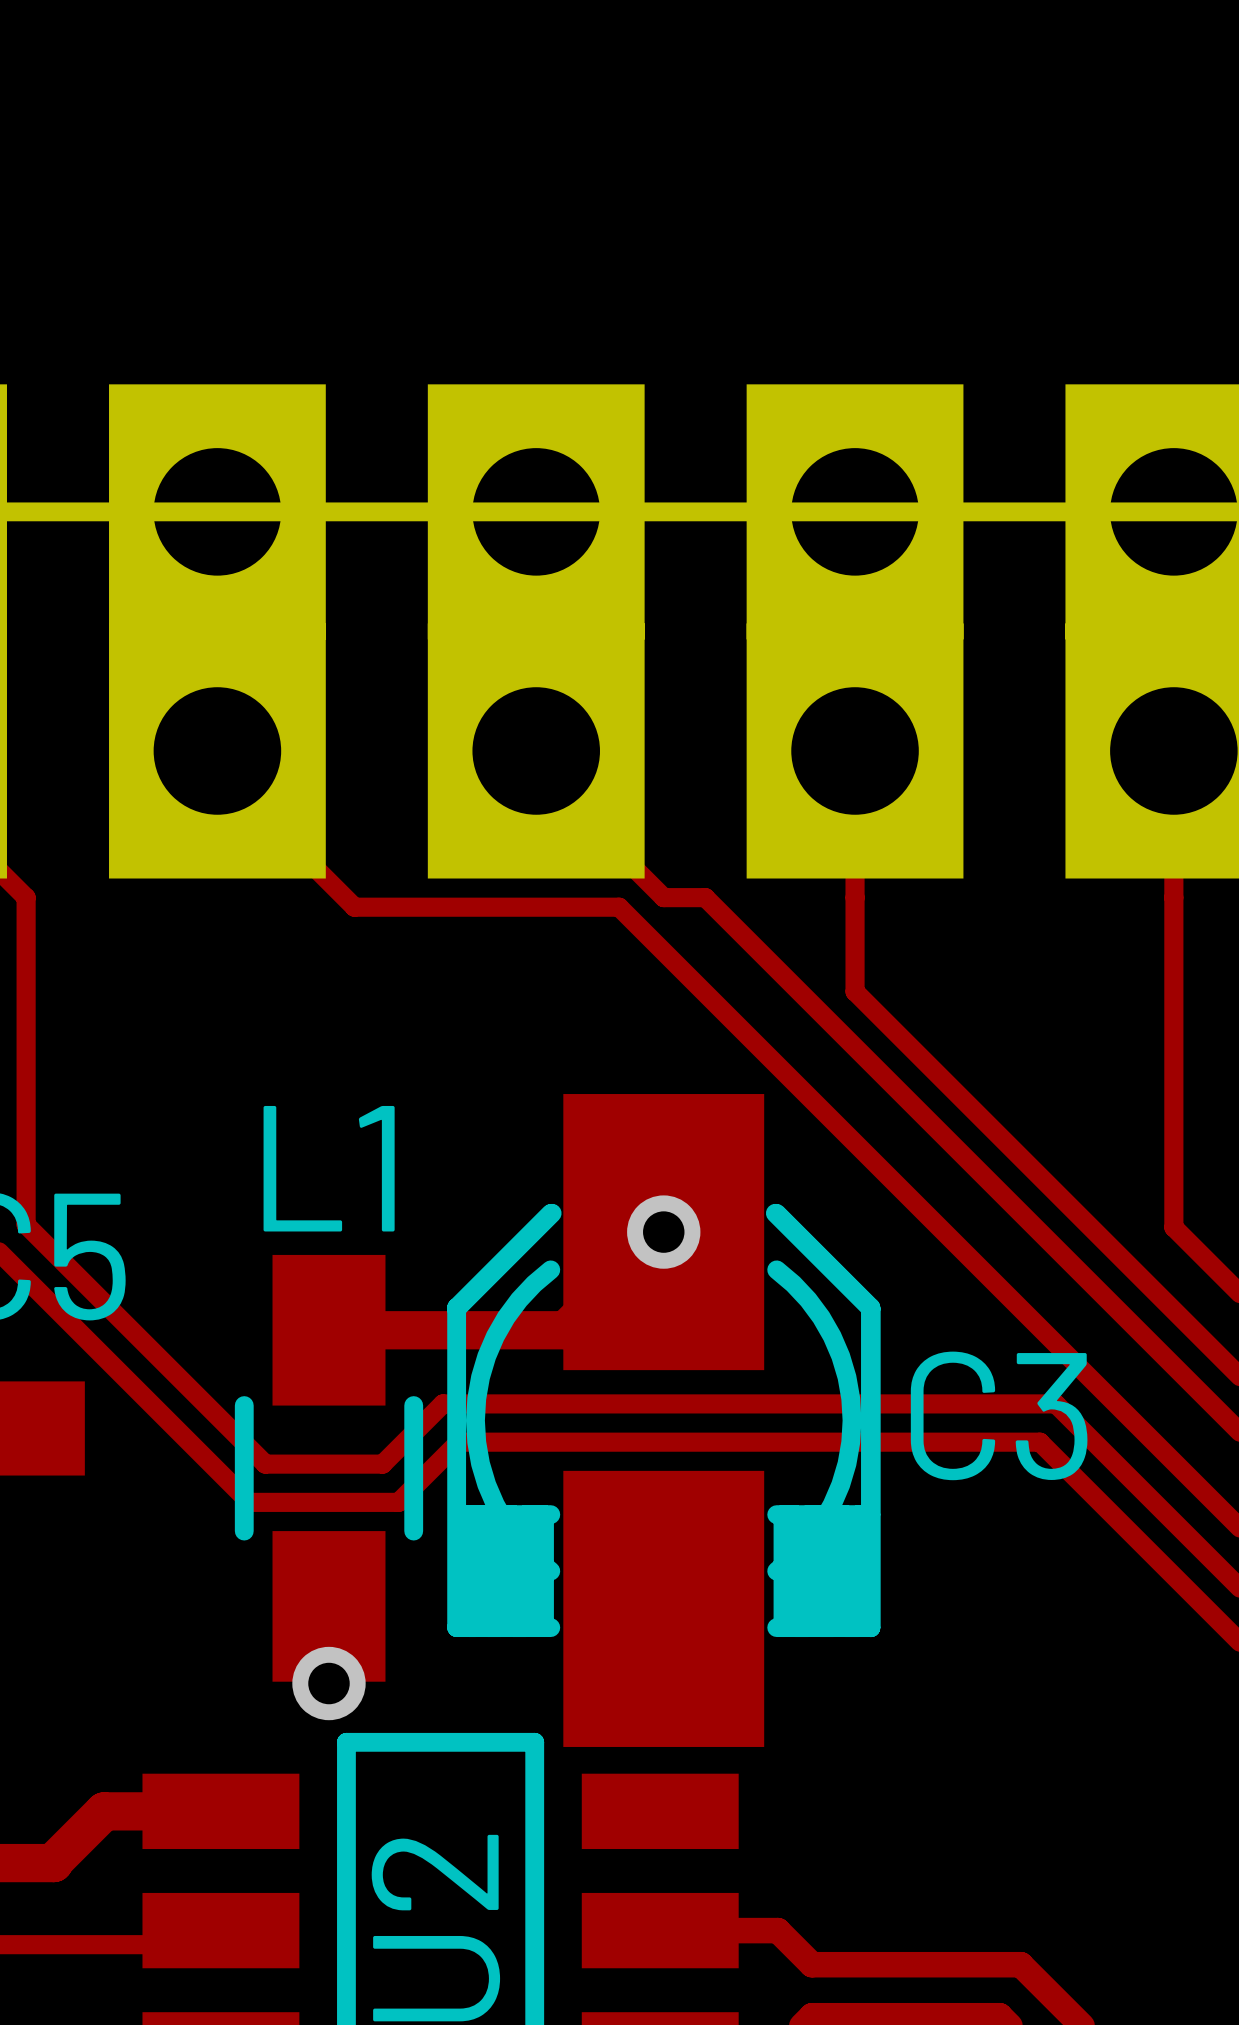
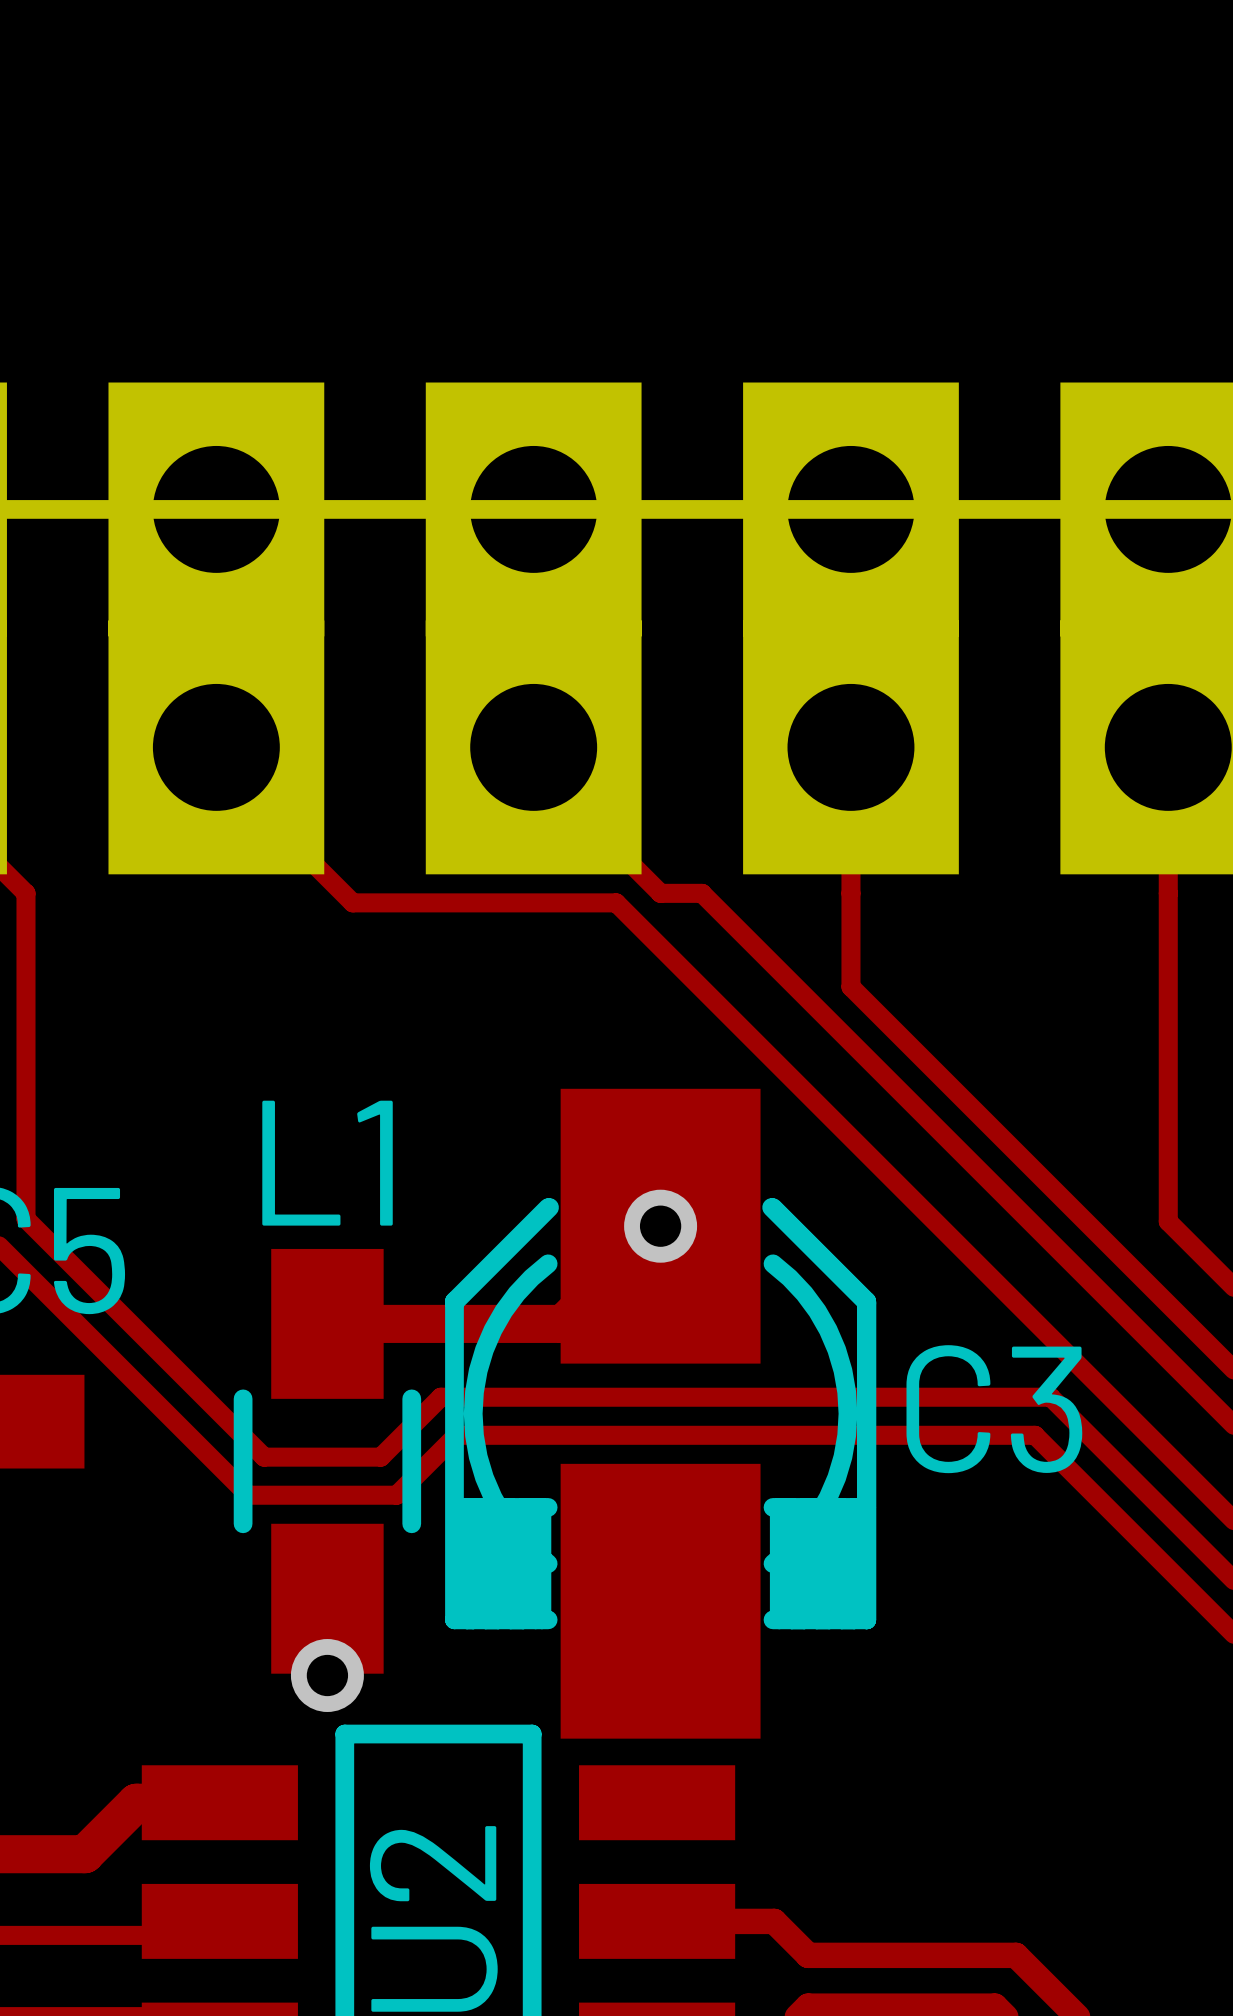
track: (137, 1811) (104, 1811) (53, 1861) -> (136, 1802) (84, 1854) (53, 1854)

